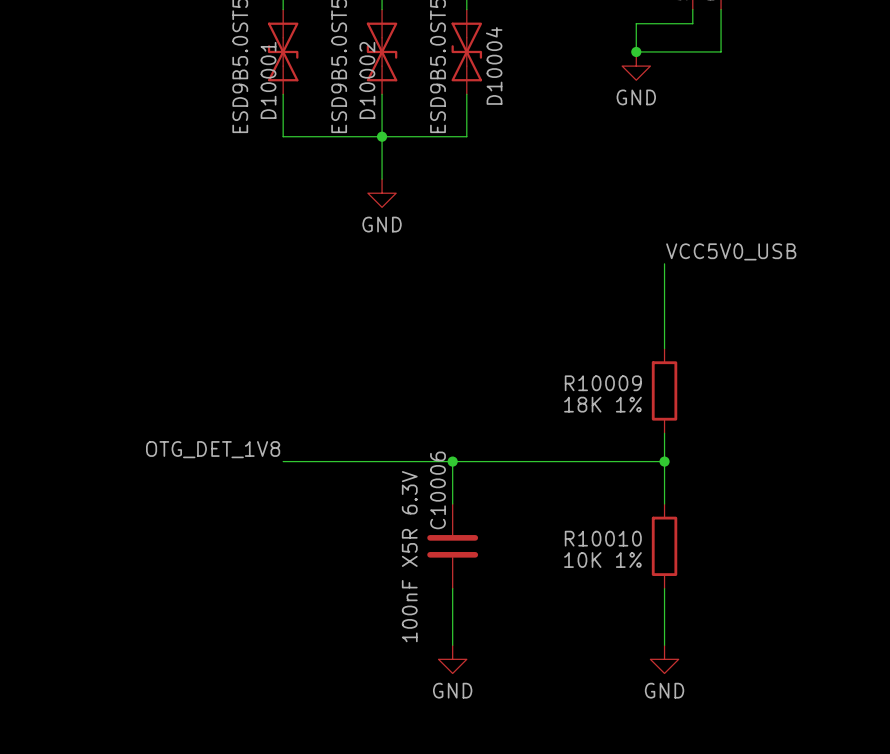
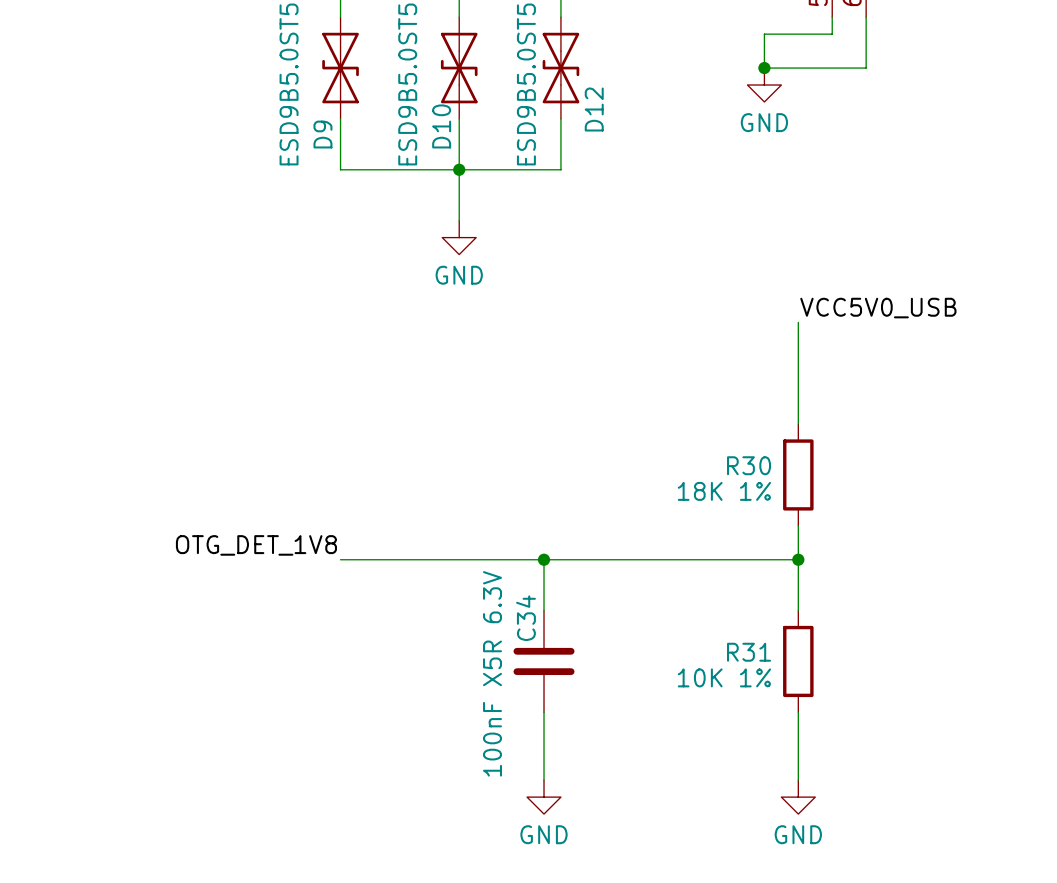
D10004 name: D10004 (494, 65) -> D12 (594, 109)
D10001 name: D10001 (268, 80) -> D9 (322, 134)
D10002 name: D10002 (367, 80) -> D10 (441, 126)
R10009 name: R10009 (603, 383) -> R30 (749, 465)
C10006 name: C10006 (438, 490) -> C34 (526, 618)
R10010 name: R10010 (603, 538) -> R31 (749, 652)

